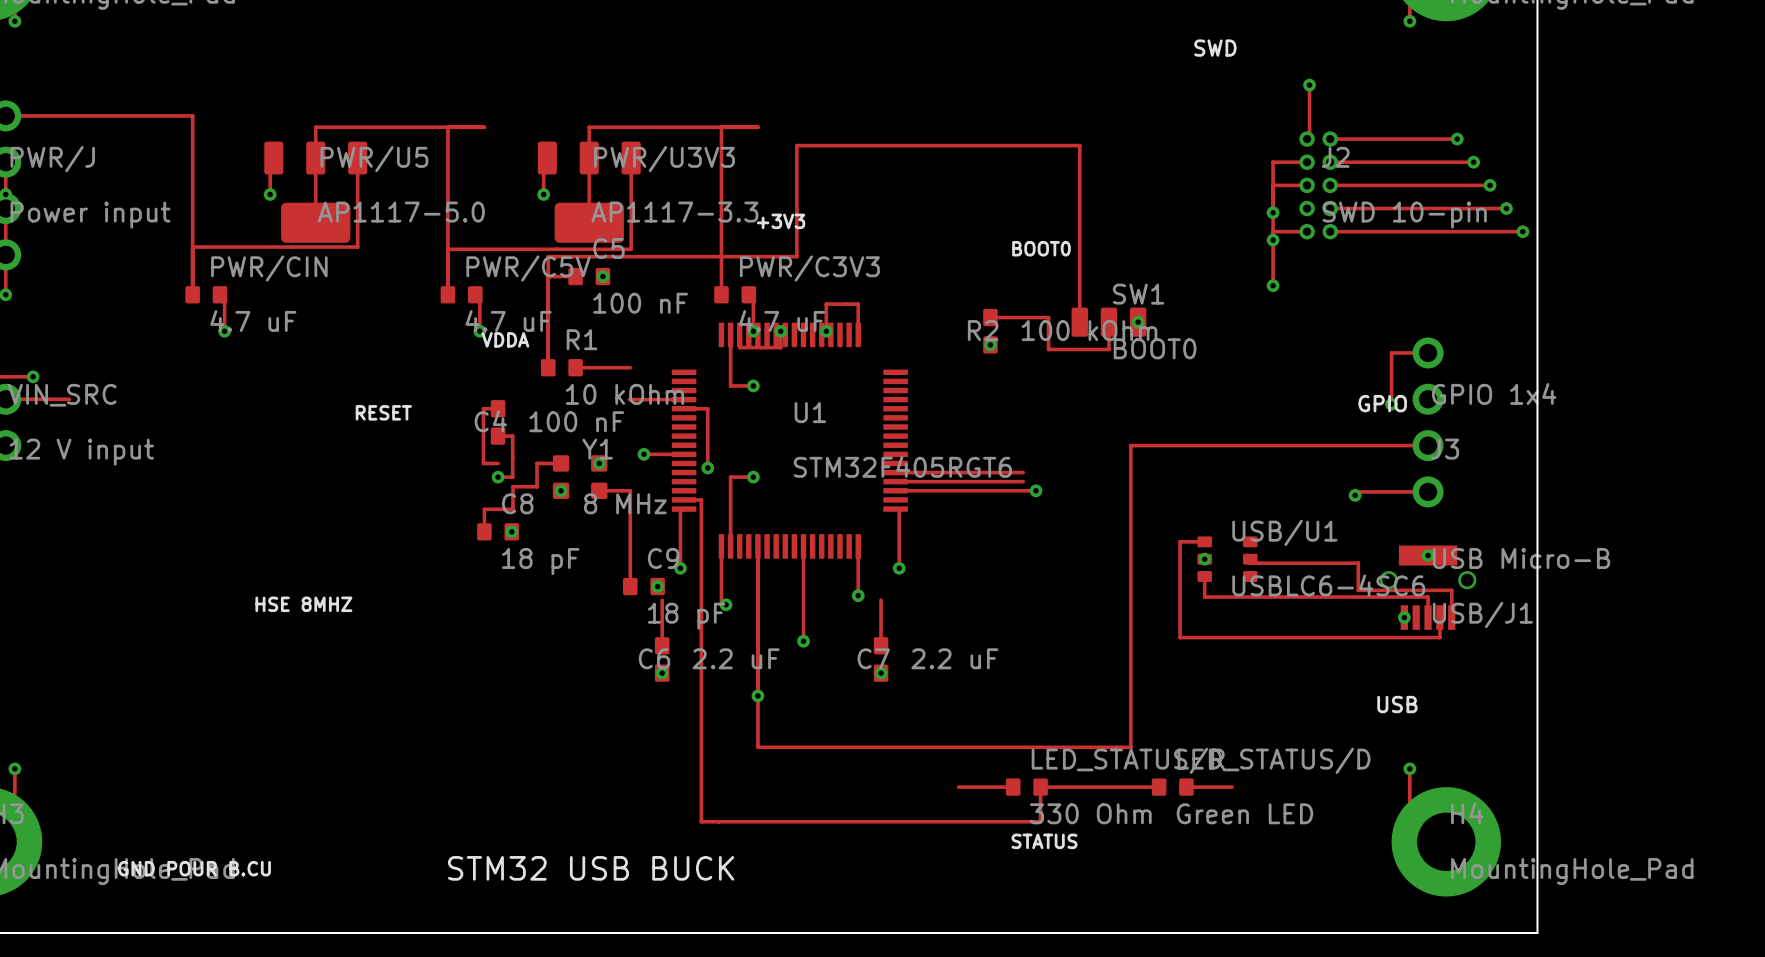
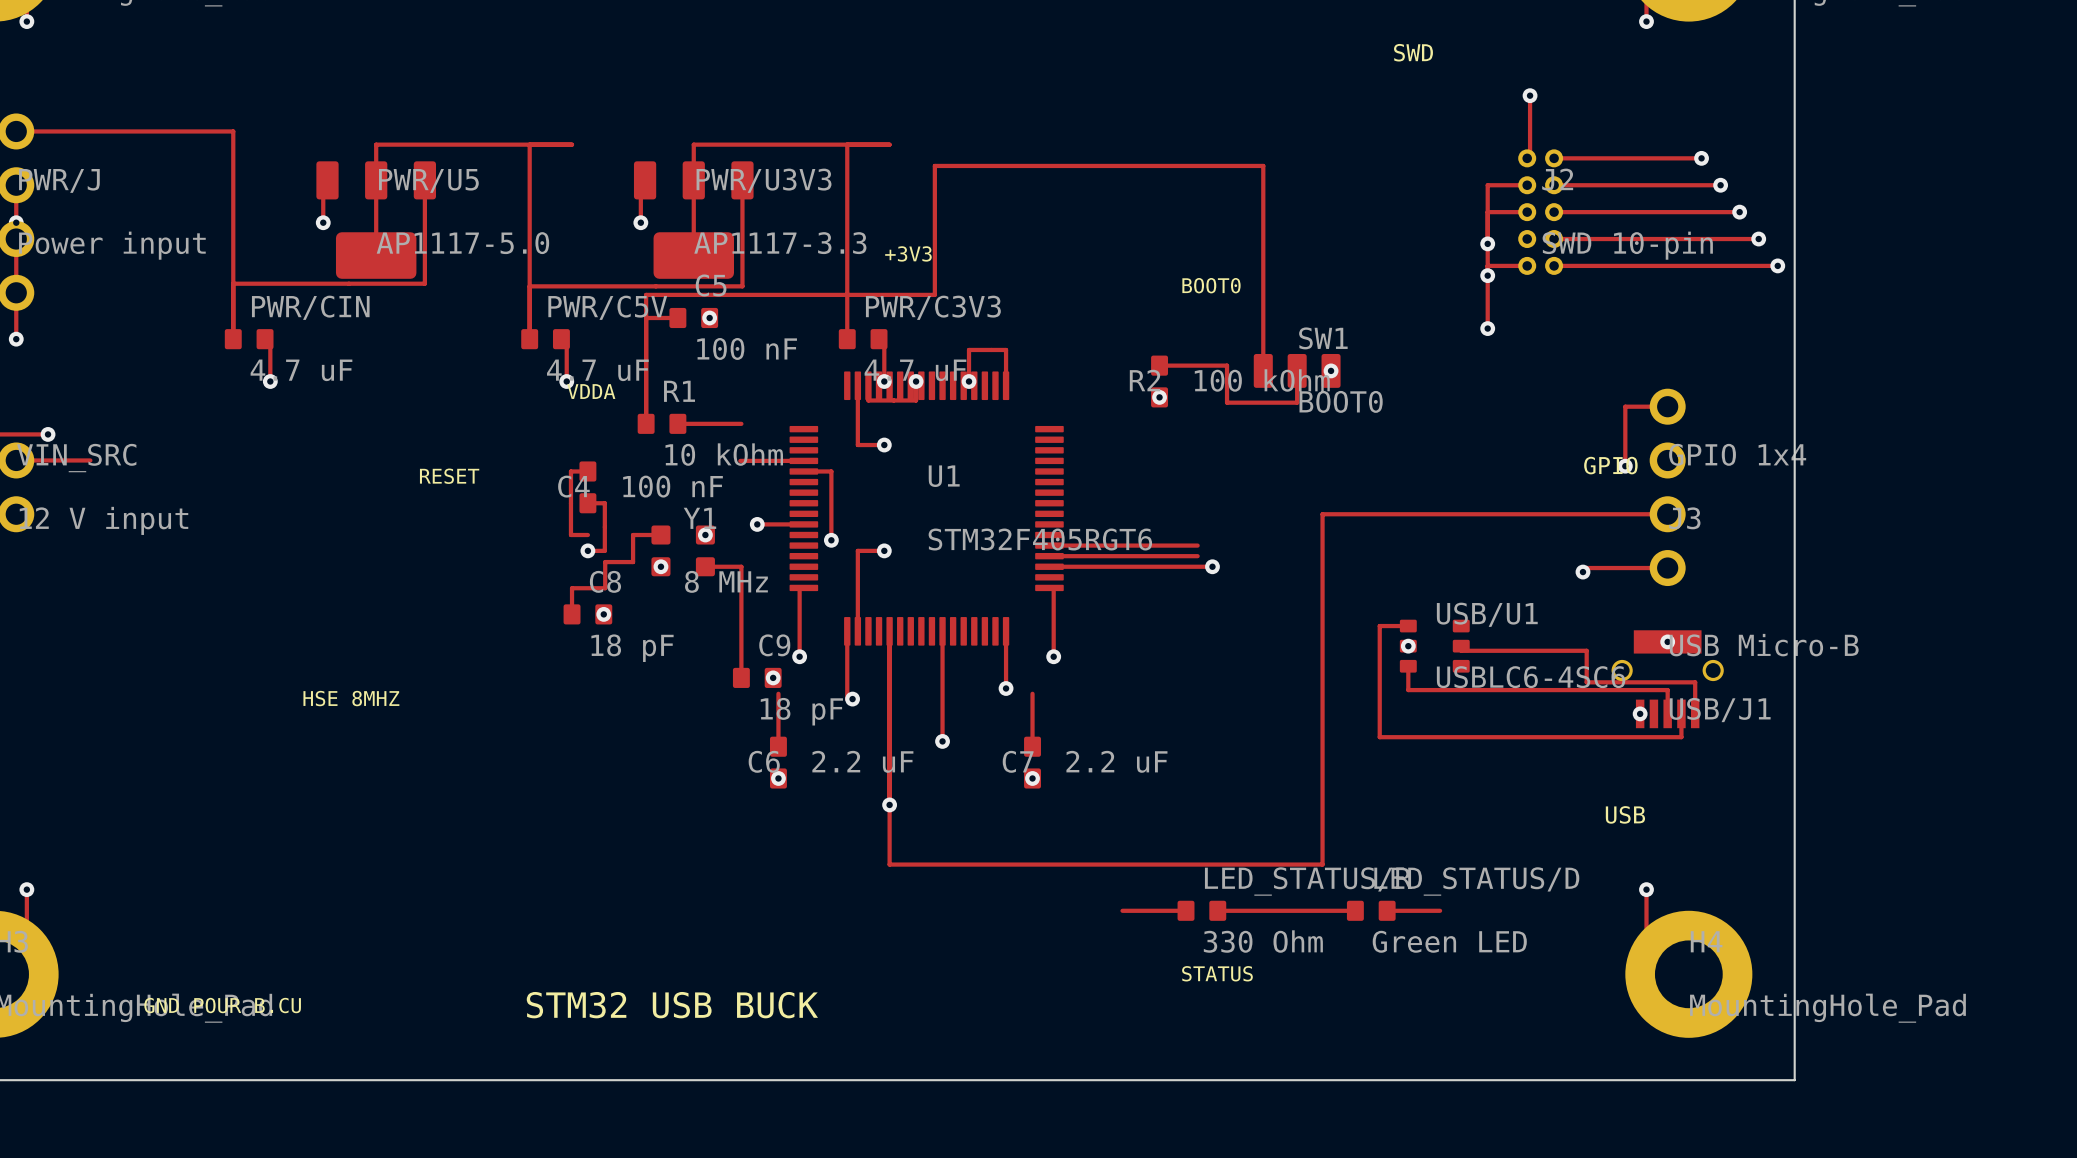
track: (684, 499) (701, 499) (701, 821) (1040, 821) (1040, 787) -> none

